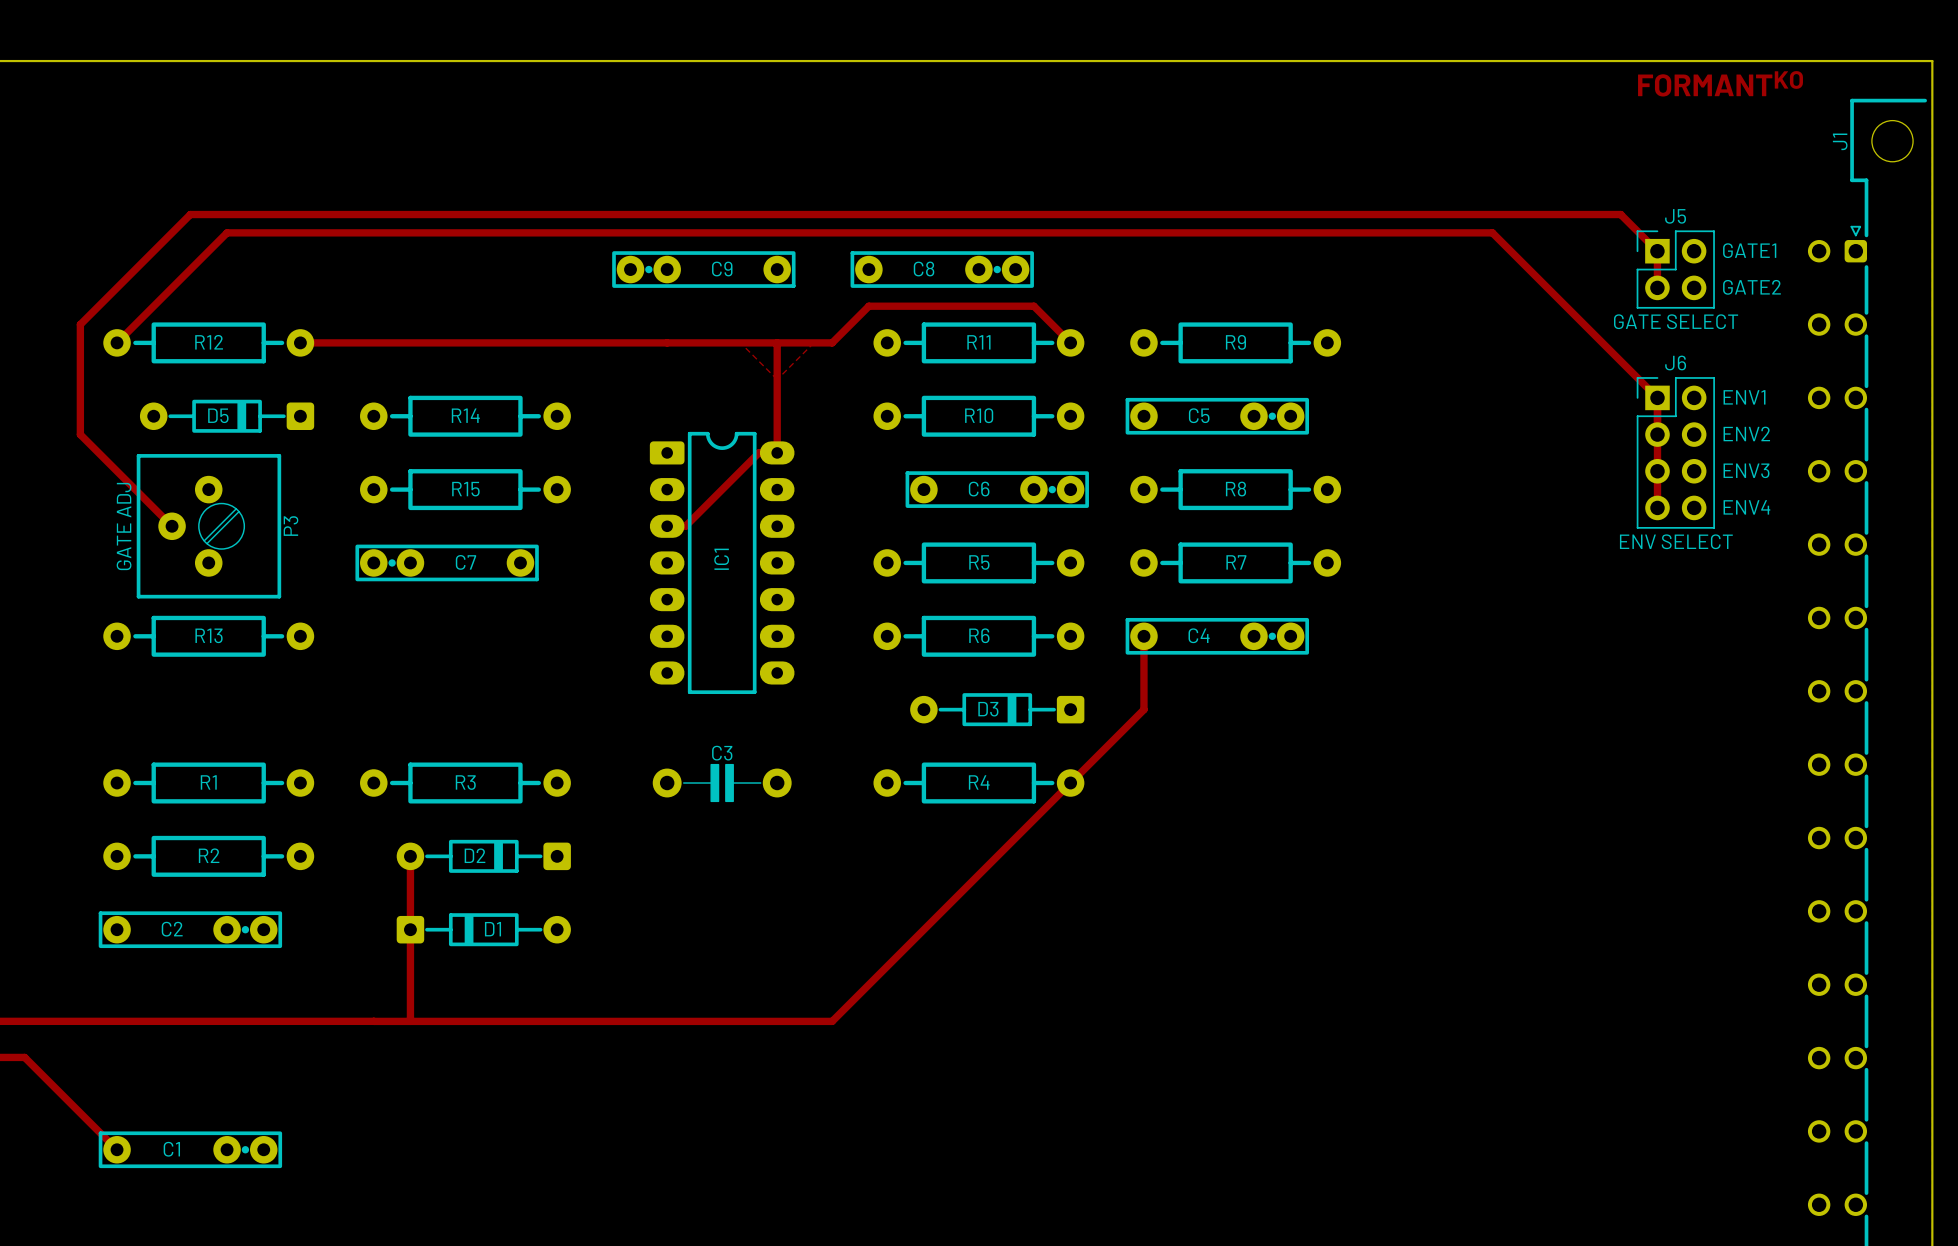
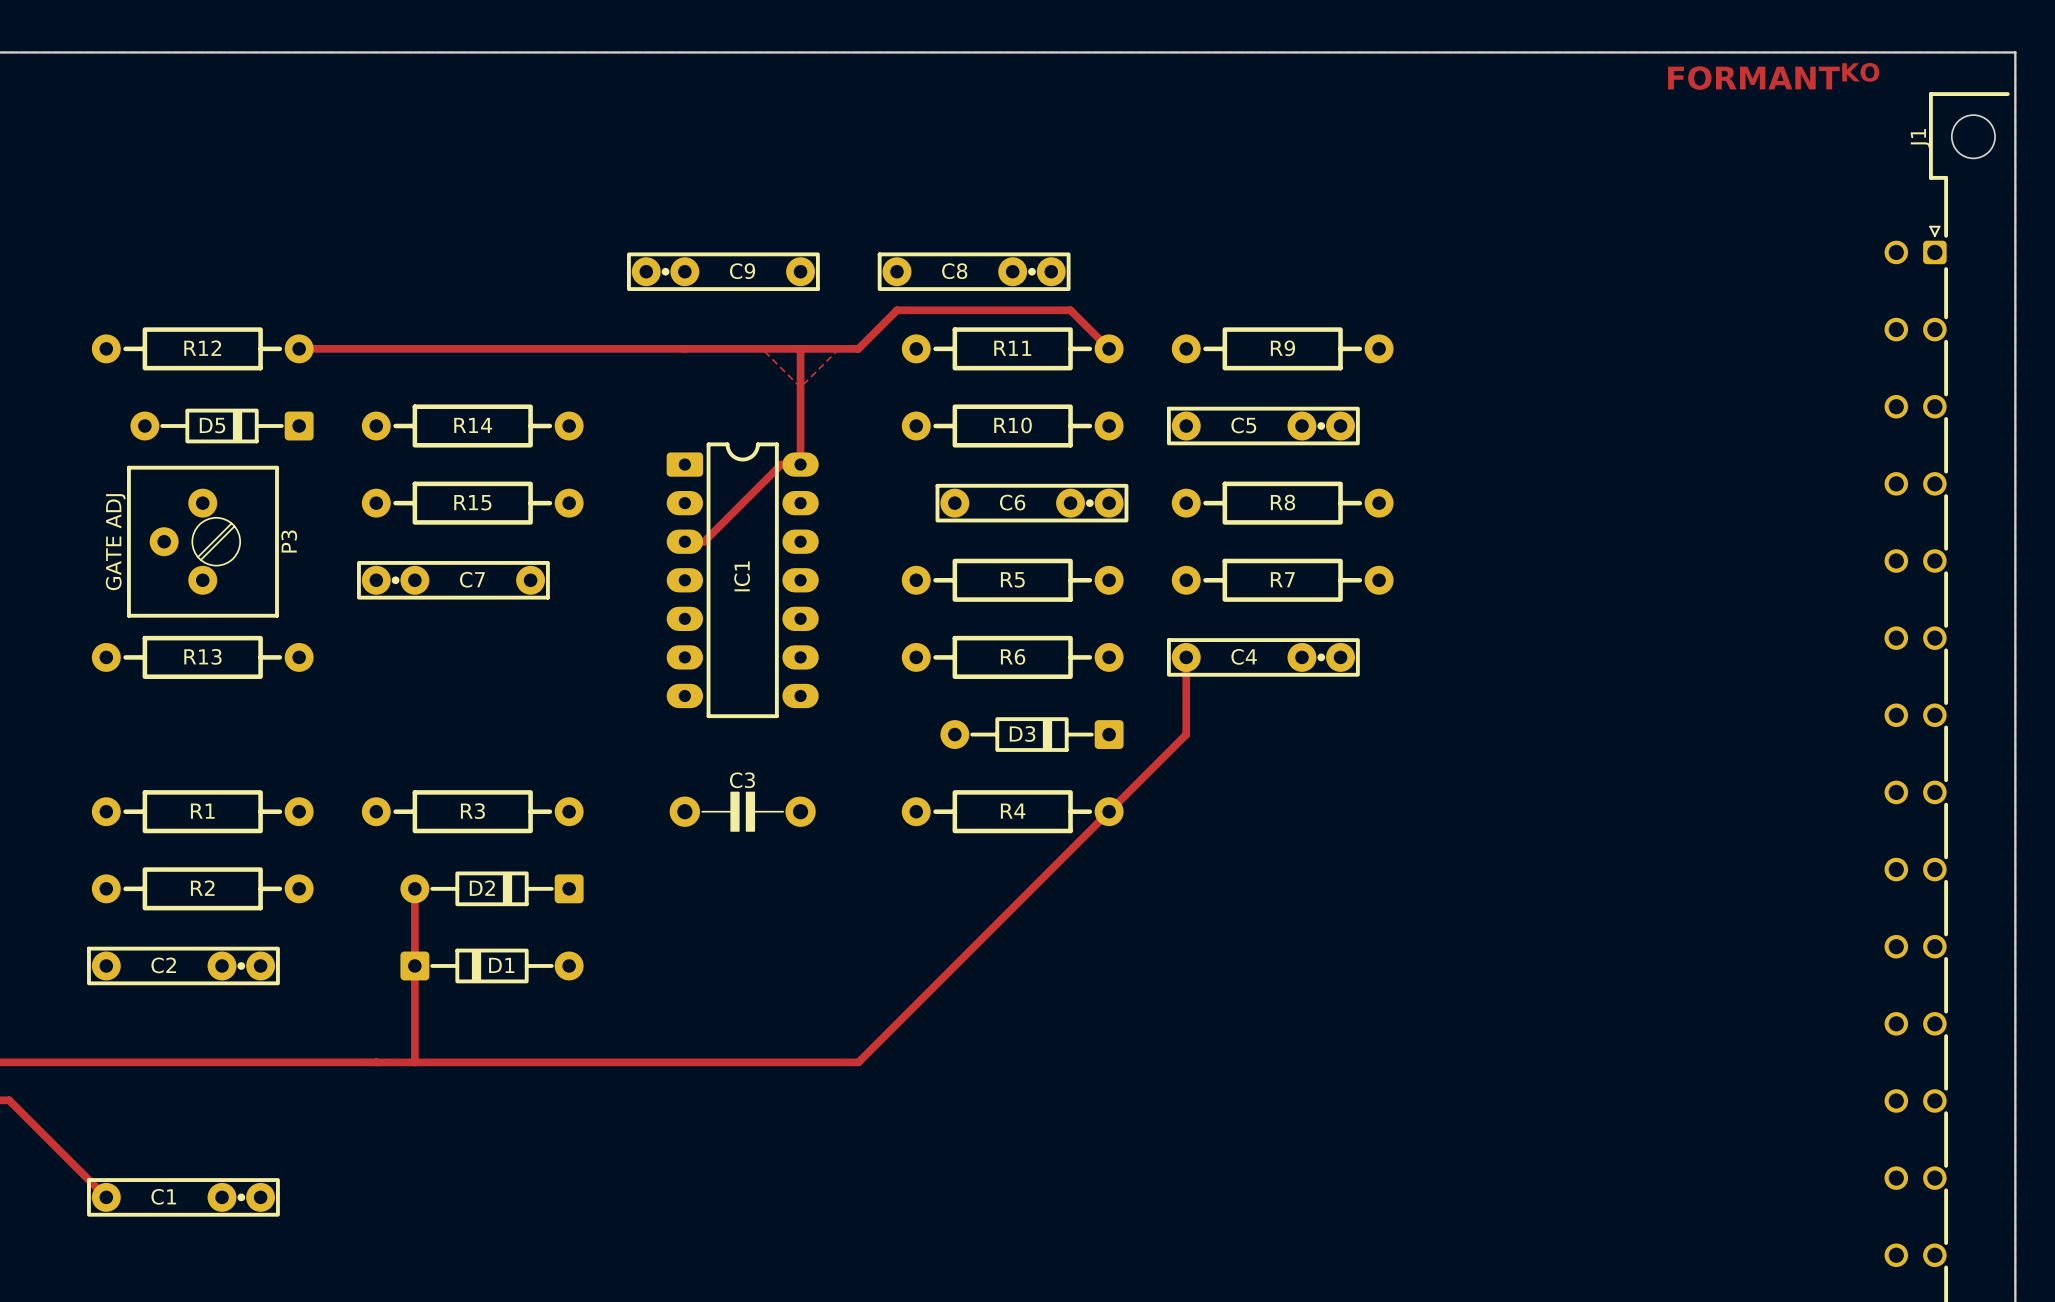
text: GATE1 (1749, 250) -> none
J5: GATE SELECT (1675, 269) -> none
track: (1657, 287) (1657, 251) (1620, 214) (190, 214) (80, 324) (80, 434) (172, 526) -> none
text: GATE2 (1751, 287) -> none
track: (117, 342) (227, 232) (1492, 232) (1657, 397) (1657, 507) -> none
text: ENV1 (1744, 397) -> none
text: ENV2 (1746, 433) -> none
J6: ENV SELECT (1675, 452) -> none
text: ENV3 (1746, 470) -> none
text: ENV4 (1746, 507) -> none

